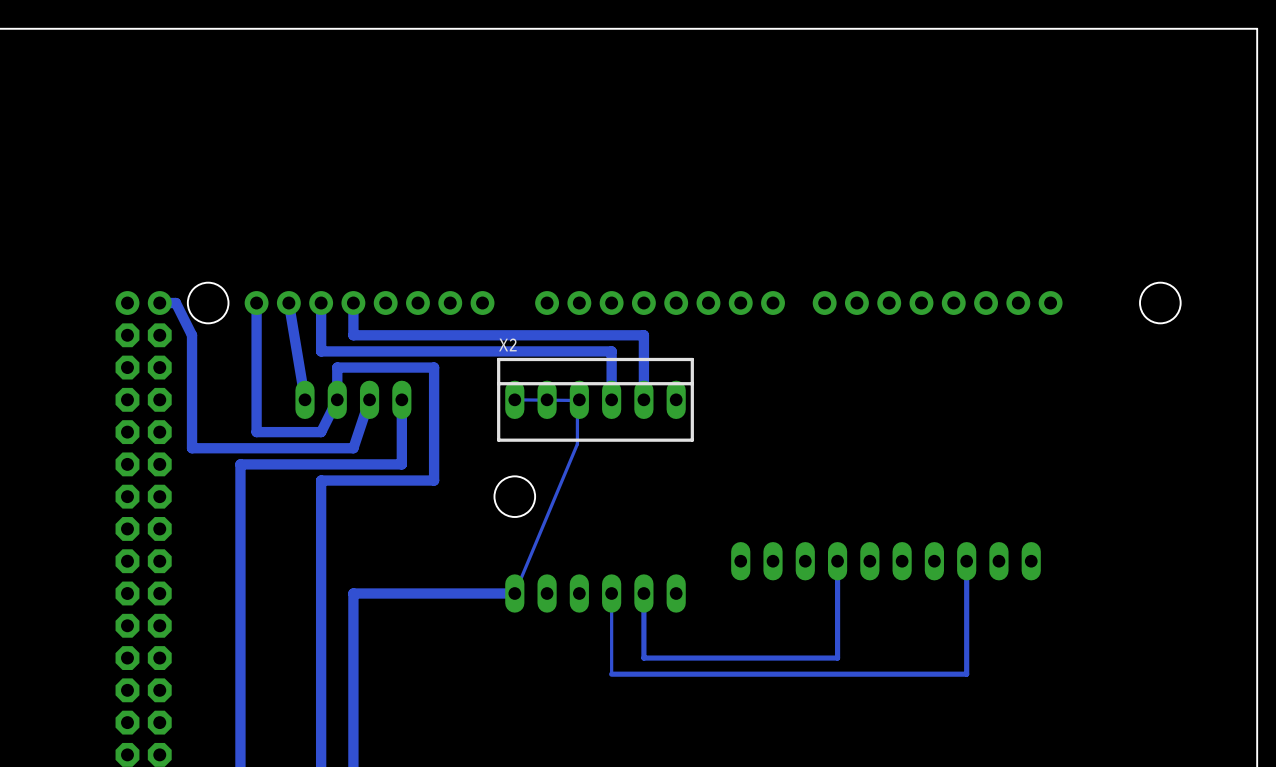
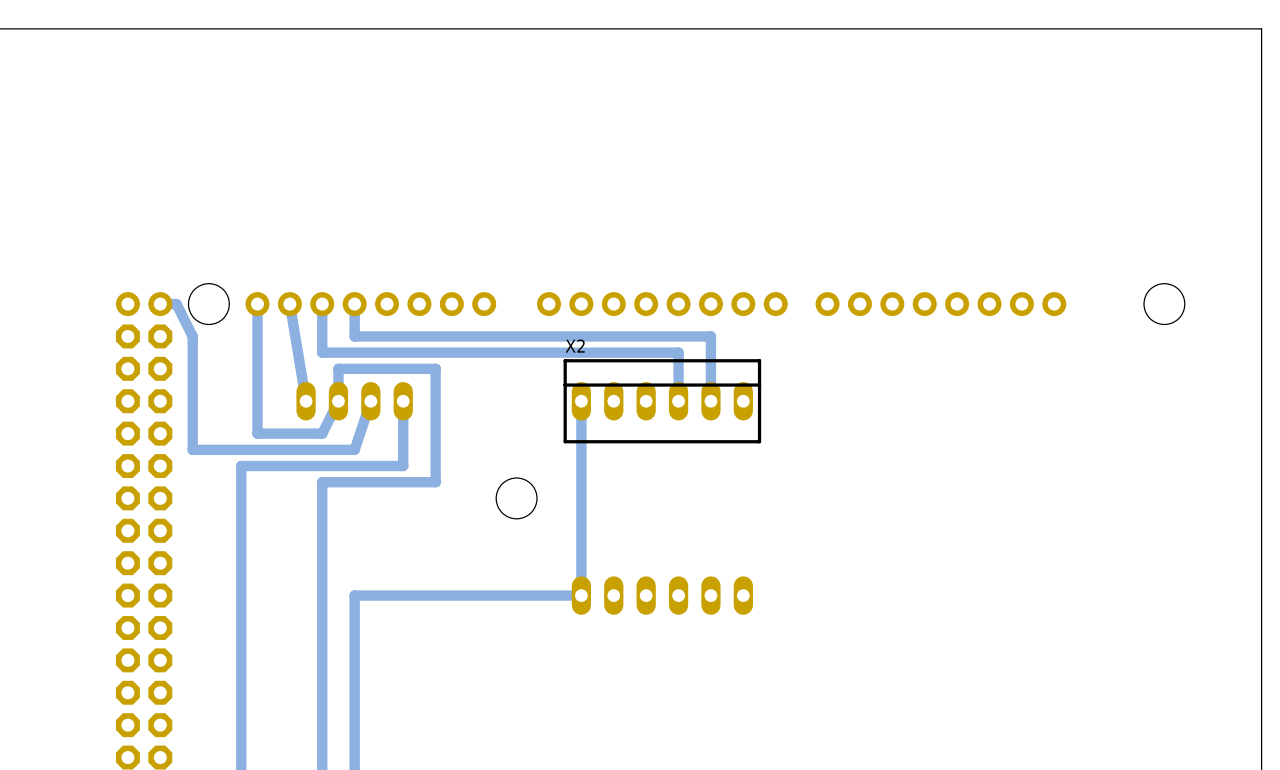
track: (643, 335) (643, 399) -> (646, 336) (710, 336) (710, 401)
track: (611, 351) (611, 399) -> (613, 352) (678, 352) (678, 401)
track: (514, 399) (577, 400) (577, 444) (514, 593) -> (581, 401) (581, 595) (516, 595)
X2 position: (595, 399) -> (662, 401)
track: (837, 561) (837, 658) (643, 658) (643, 593) -> none
part: (885, 561) -> none
track: (966, 561) (966, 674) (611, 674) (611, 593) -> none
part position: (595, 593) -> (662, 595)

